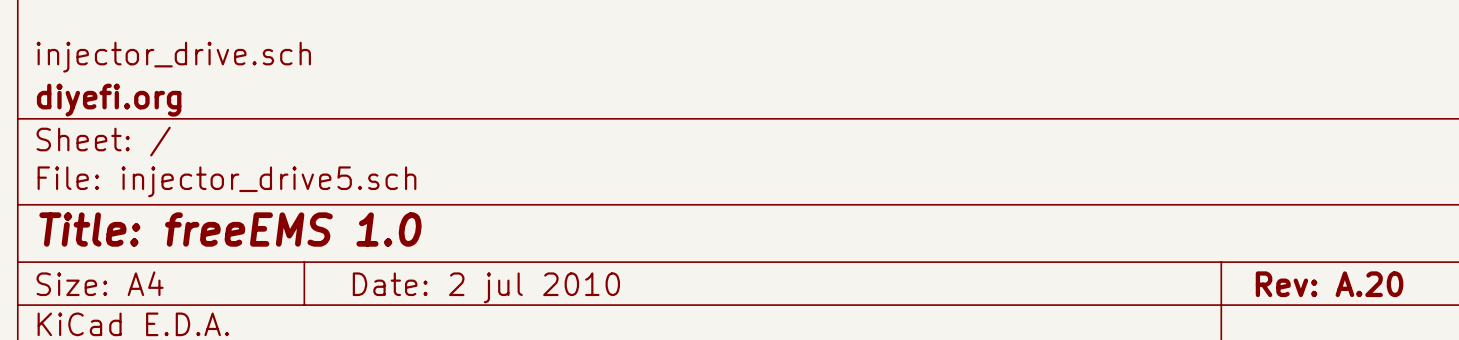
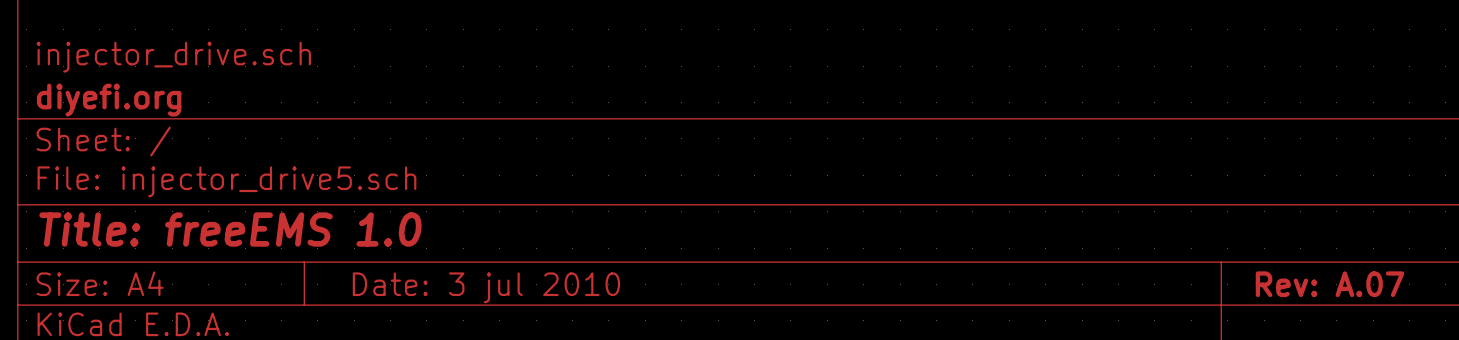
title block: Rev: A.20 (1329, 284) -> Rev: A.07 (1330, 284)
title block: Date: 2 jul 2010 (486, 287) -> Date: 3 jul 2010 (486, 287)

